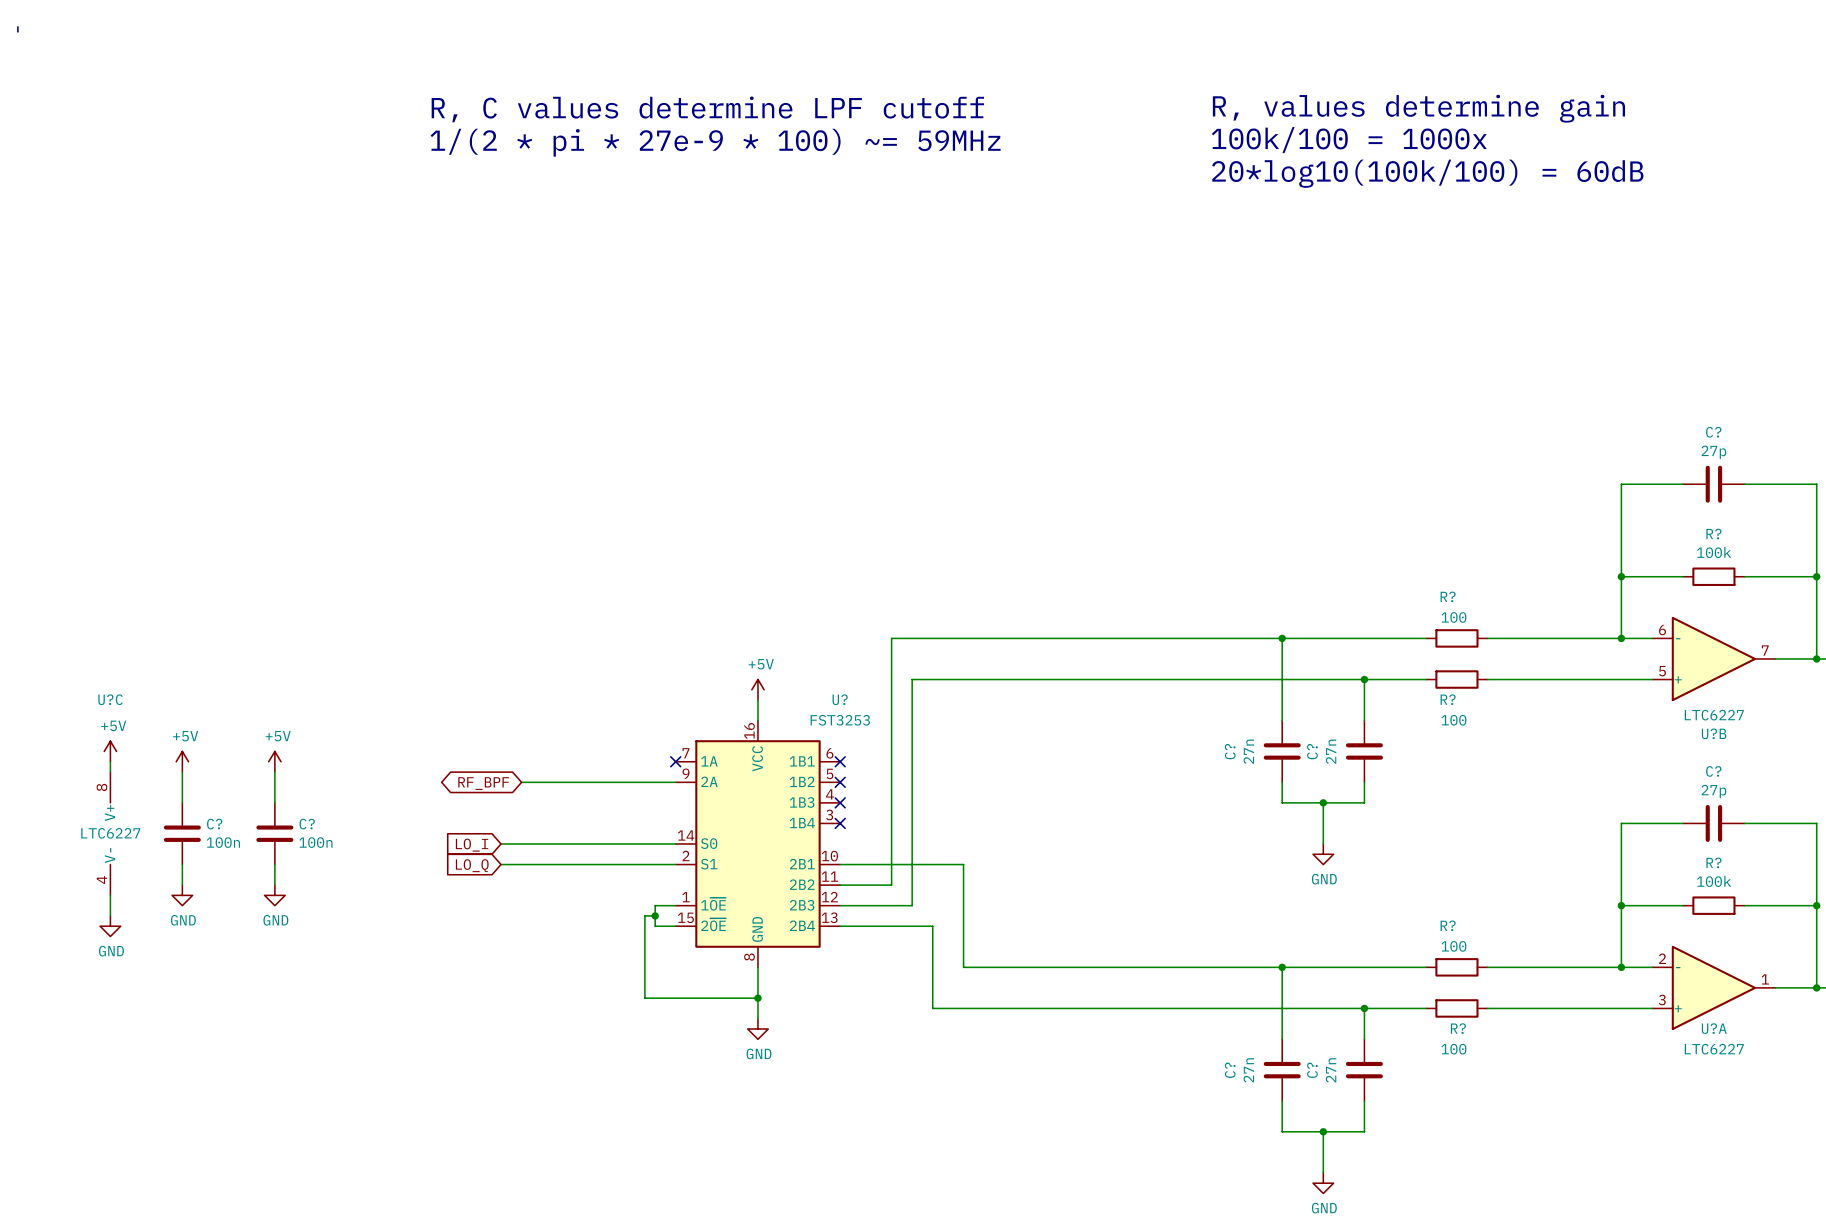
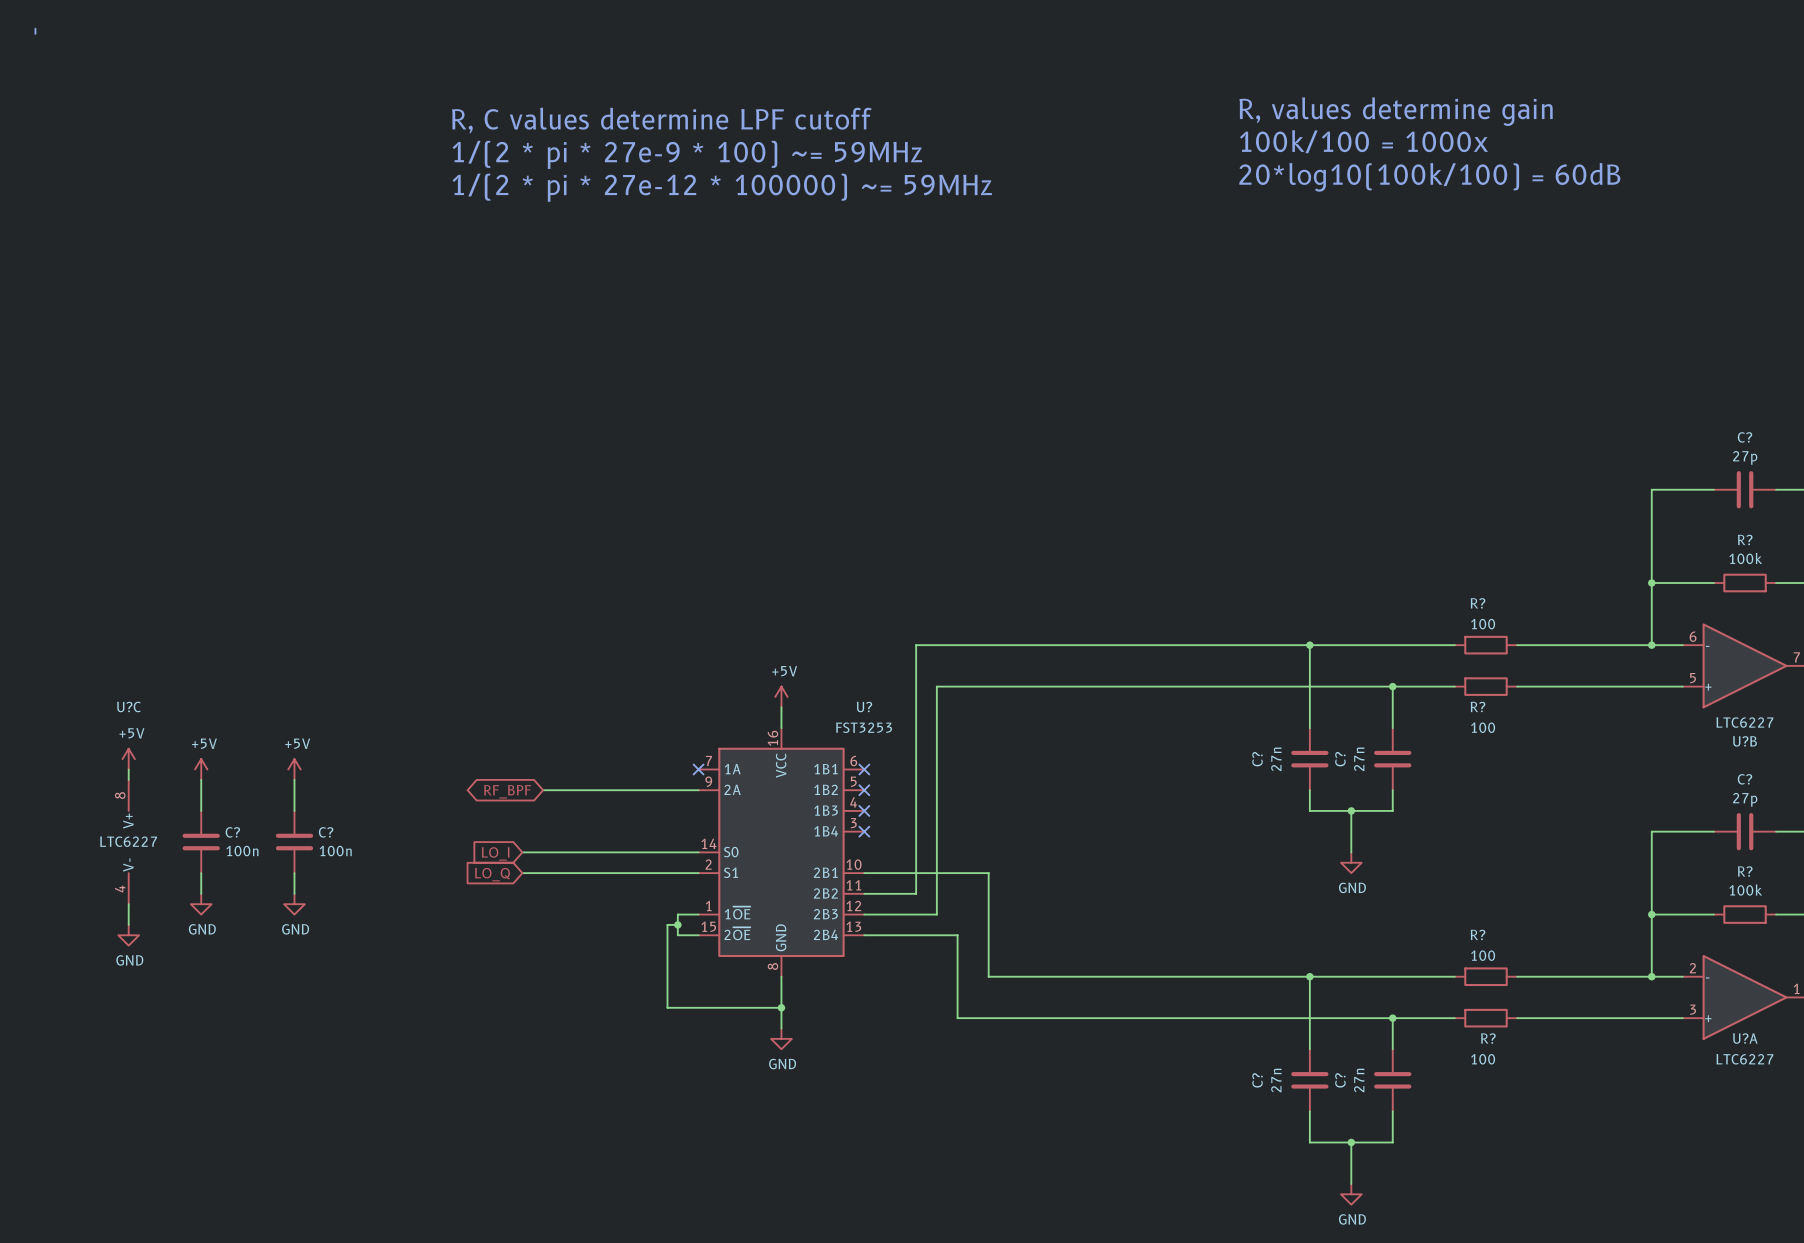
text position: R, C values determine LPF cutoff (707, 109) -> R, C values determine LPF cutoff (661, 120)
text position: 1/(2 * pi * 27e-9 * 100) ~= 59MHz (715, 142) -> 1/(2 * pi * 27e-9 * 100) ~= 59MHz (687, 154)
text: none -> 1/(2 * pi * 27e-12 * 100000) ~= 59MHz (722, 187)

